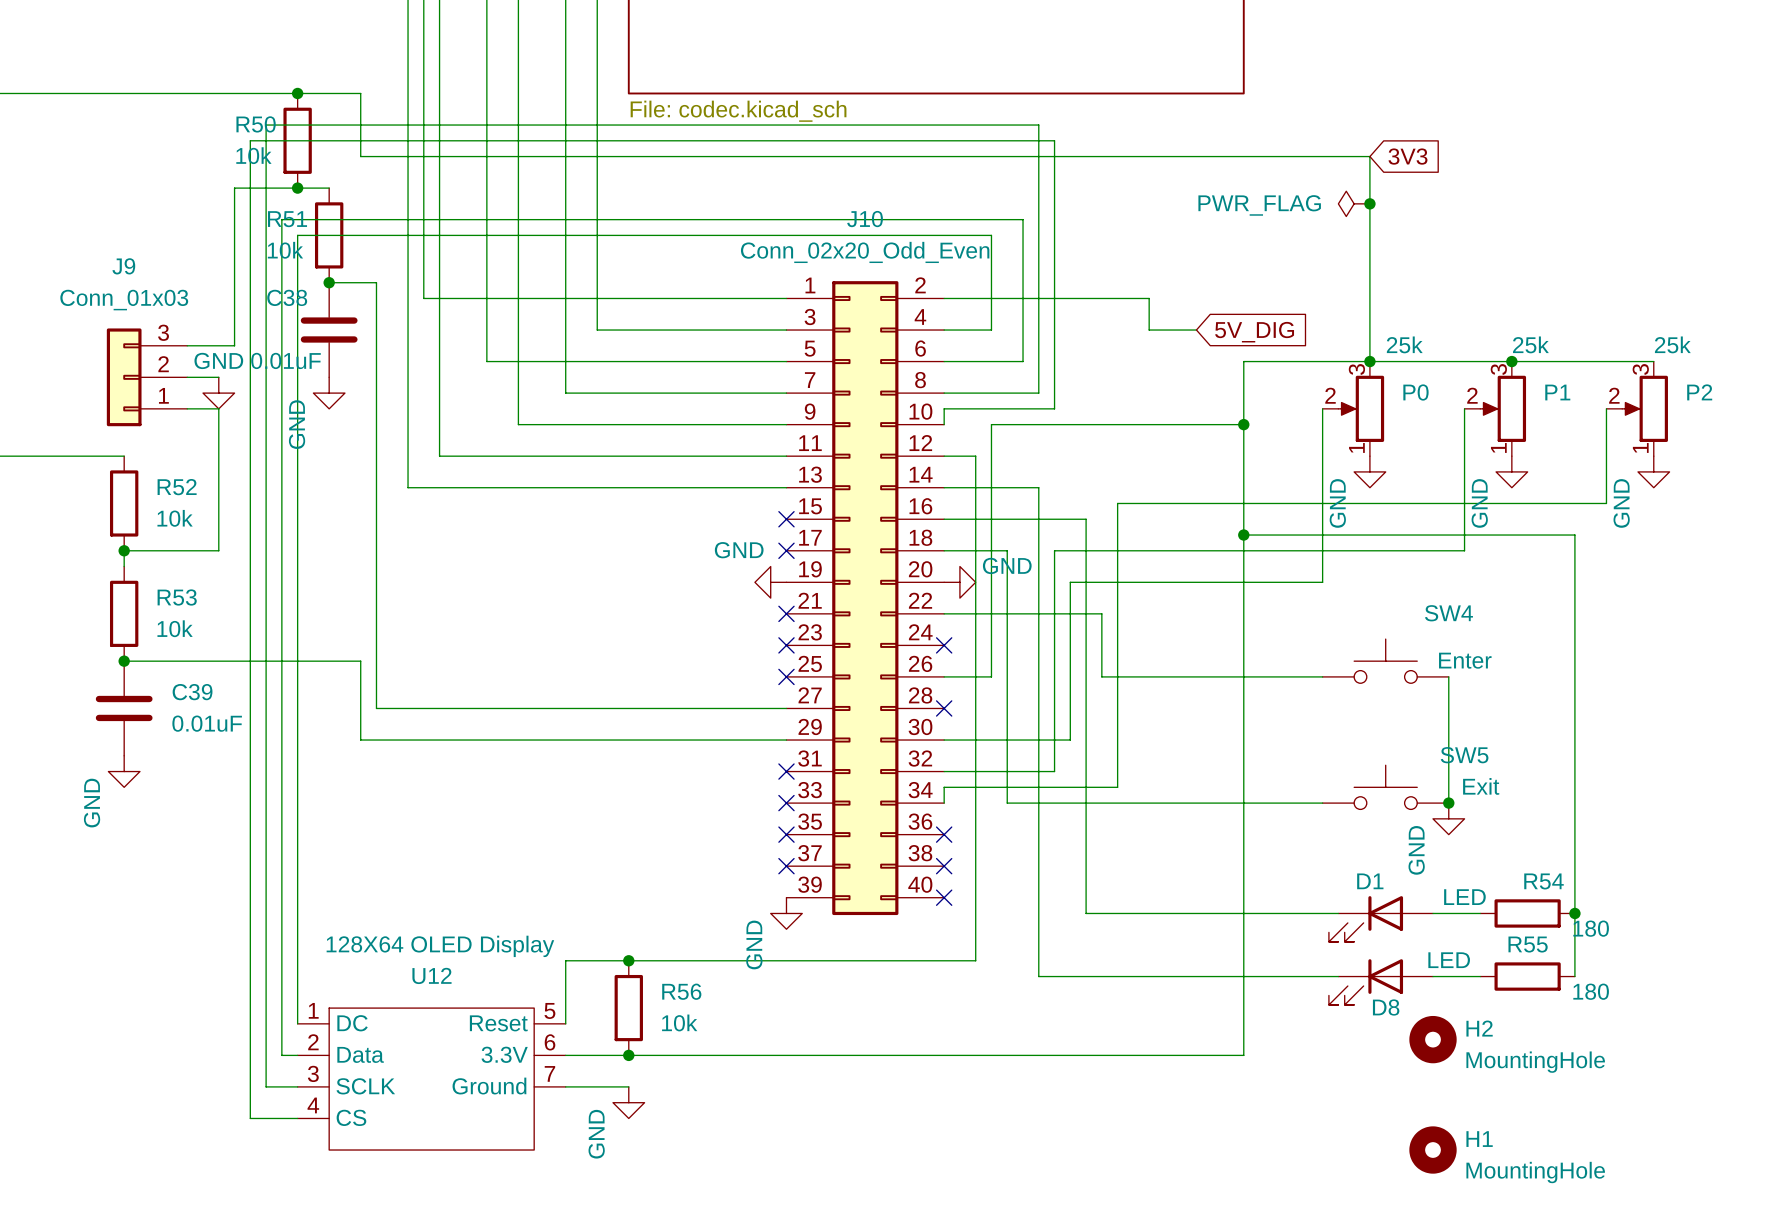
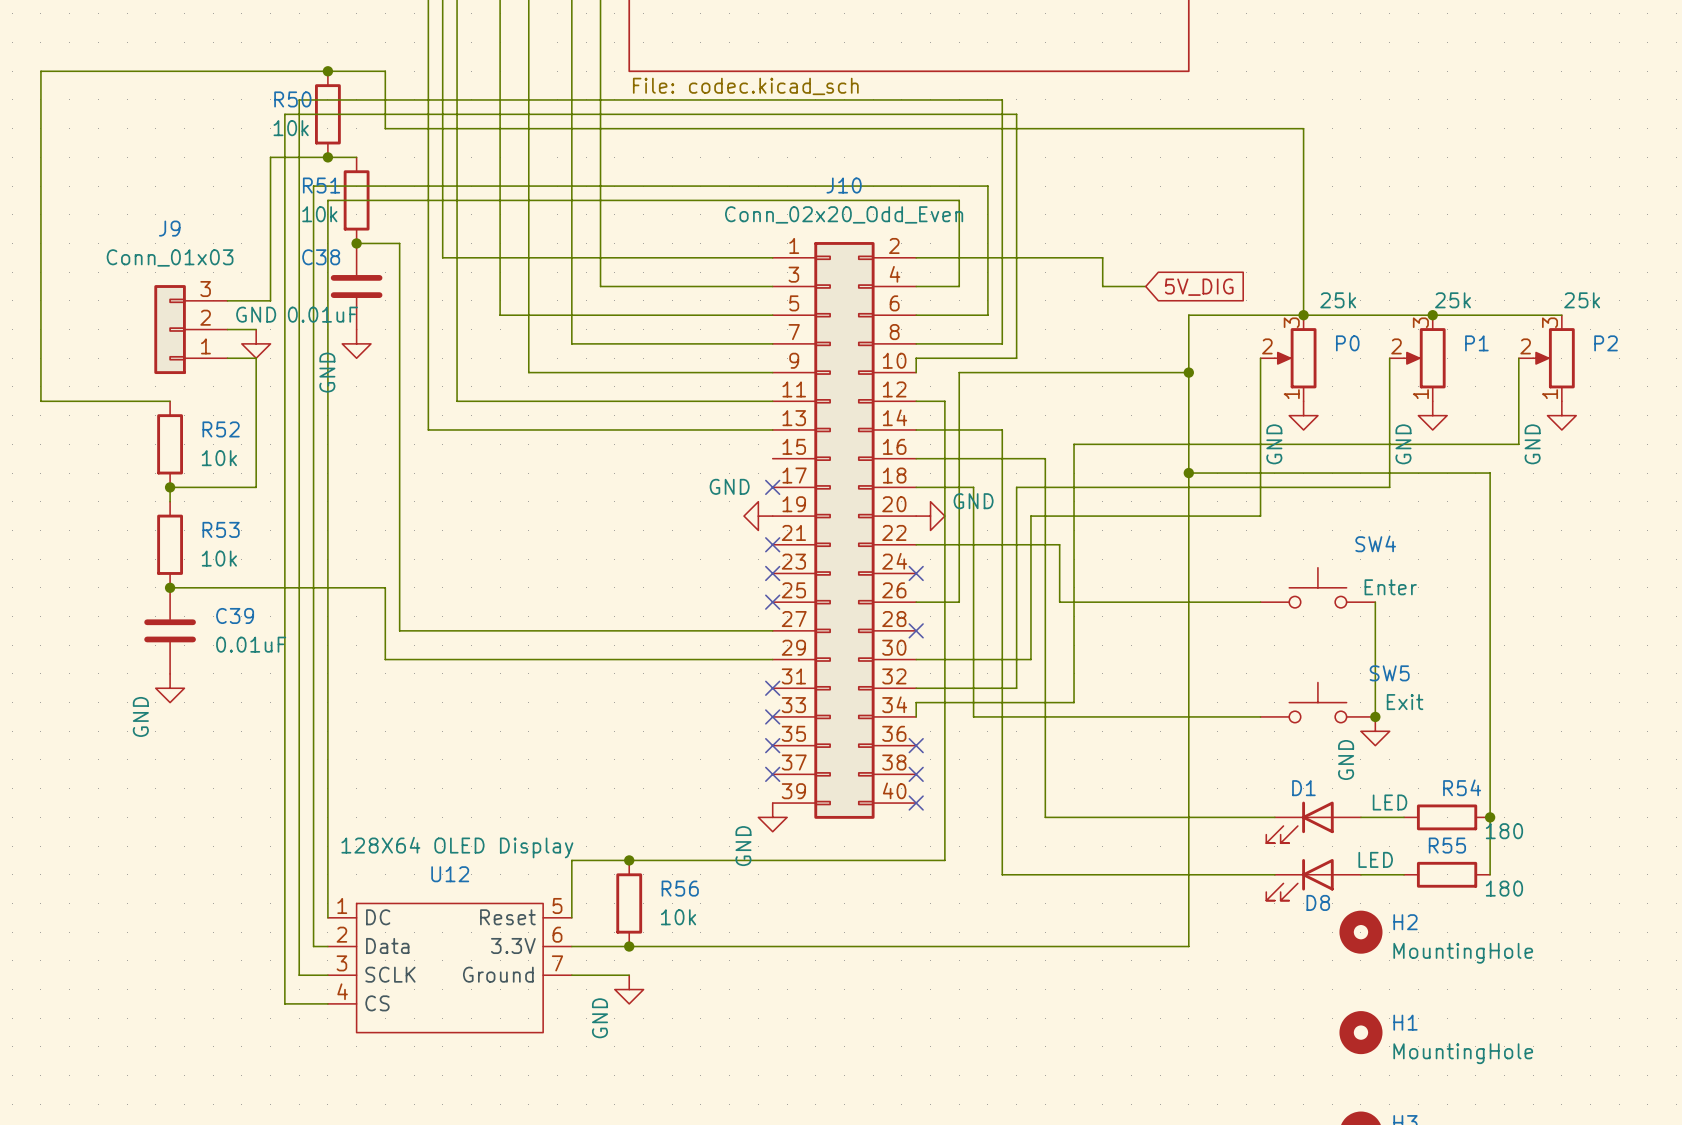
global label: 3V3 (1407, 156) -> none
power symbol: PWR_FLAG (1354, 203) -> none
junction: (1369, 203) -> none
no-connect mark: (786, 519) -> none

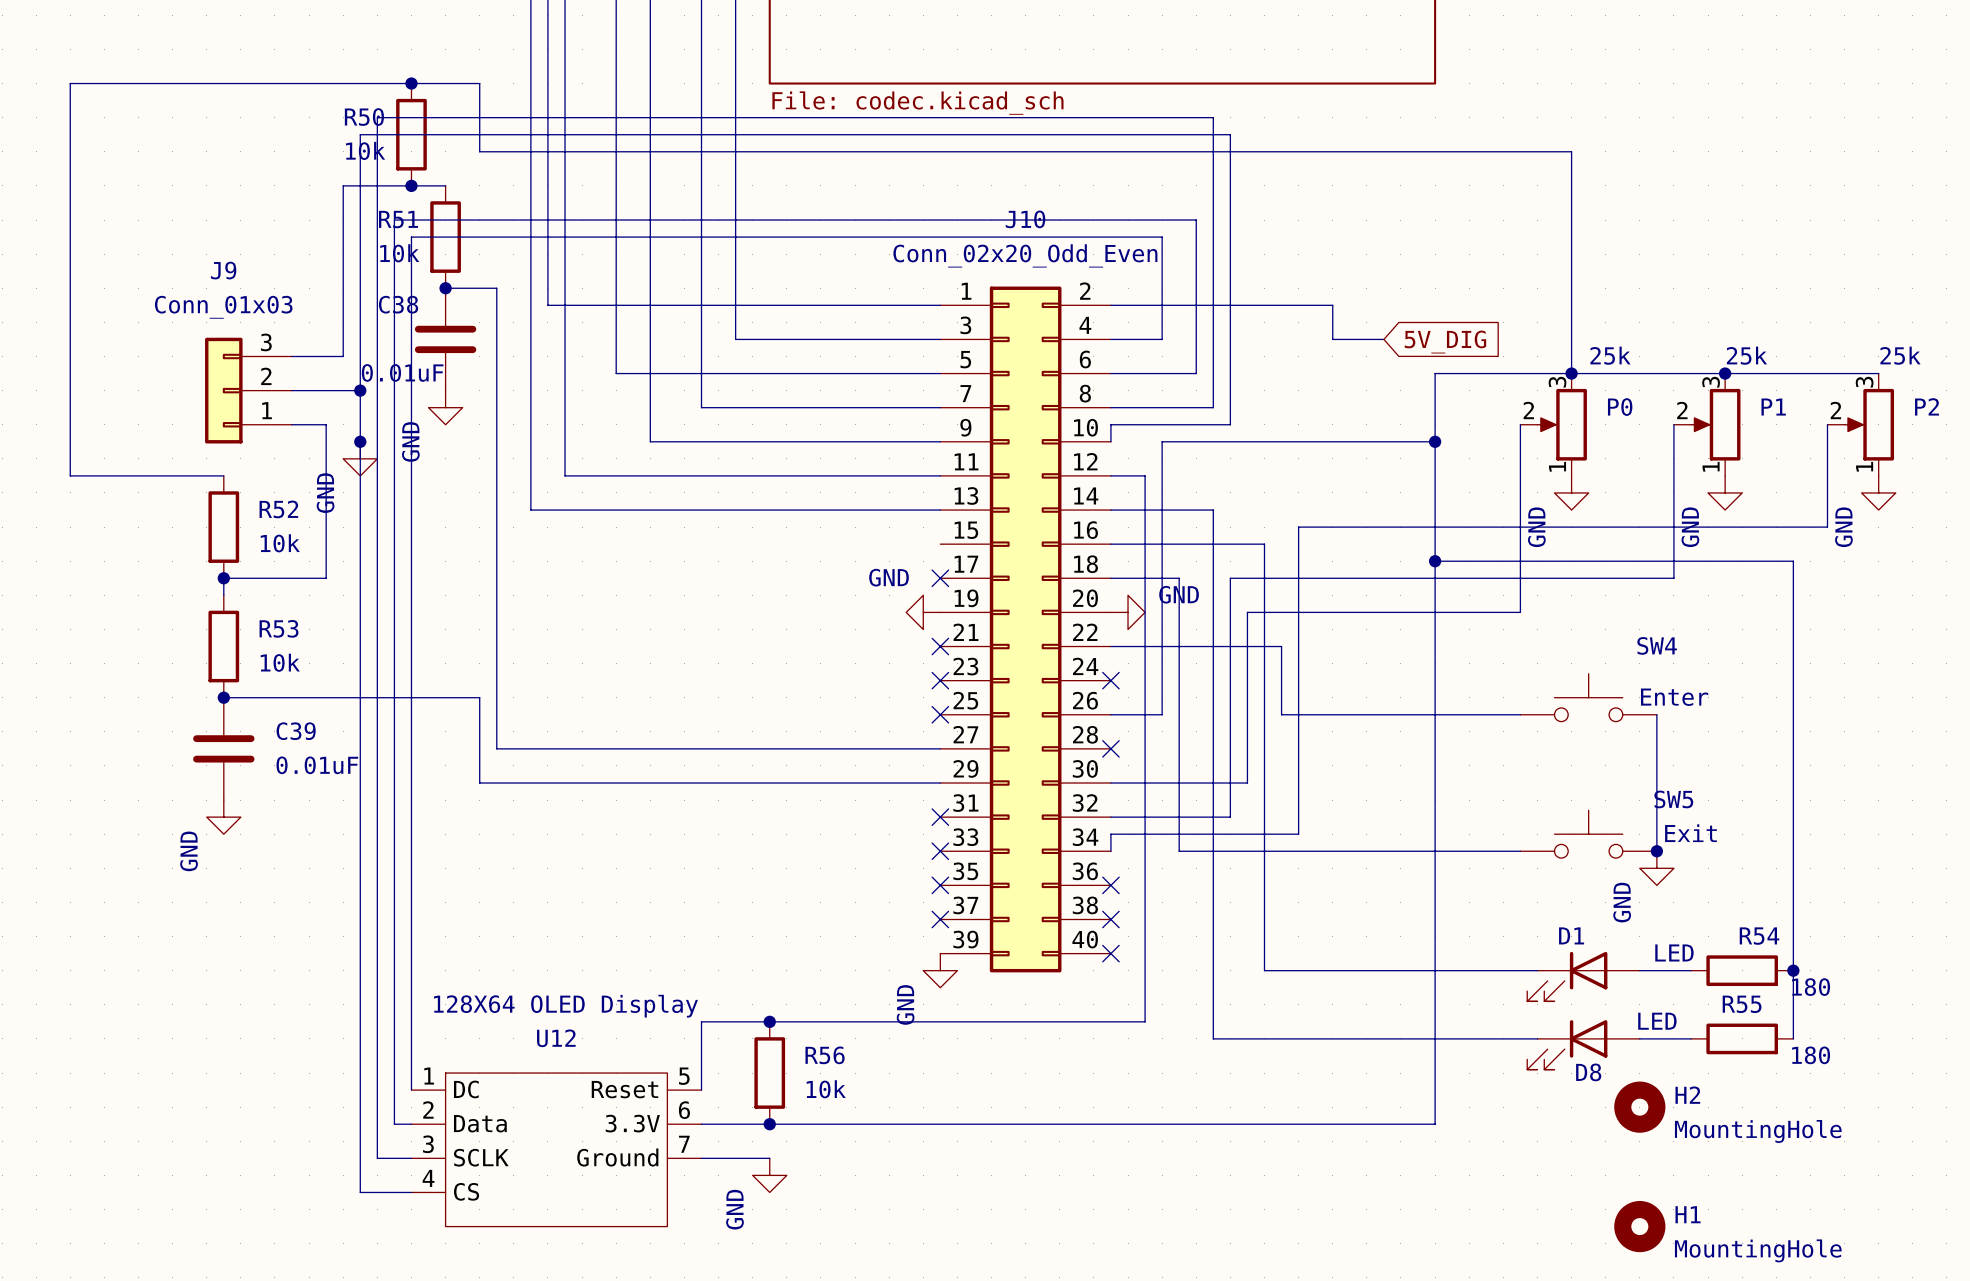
power symbol text rotation: 0° (256, 314) -> 90° counterclockwise (325, 493)
power symbol text position: GND (256, 314) -> GND (325, 493)
wire: none -> (326, 390) (360, 390)
junction: none -> (360, 390)
power symbol position: GND (256, 343) -> GND (360, 458)
junction: none -> (360, 441)

